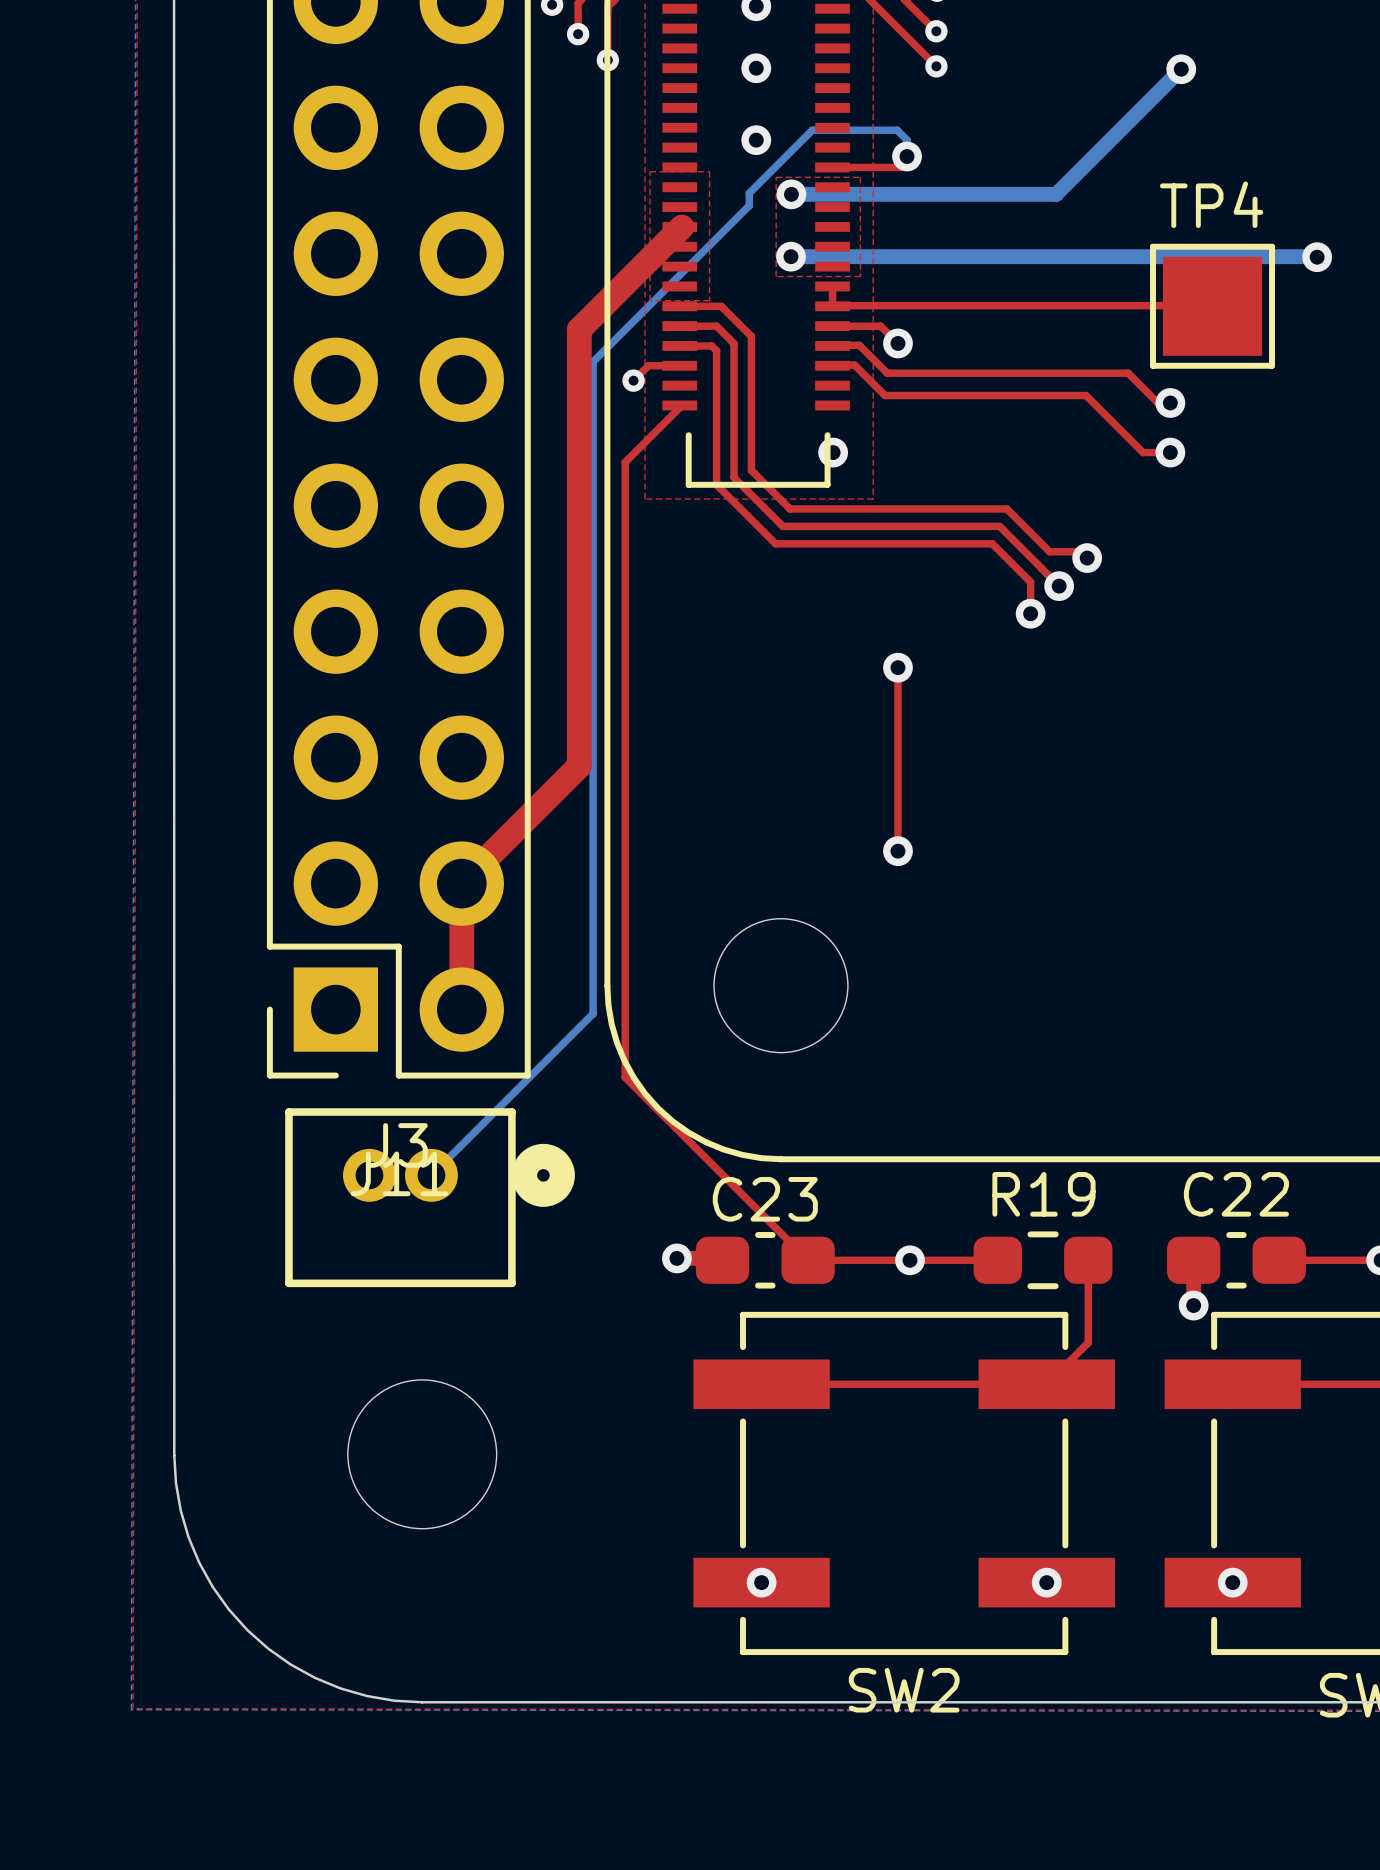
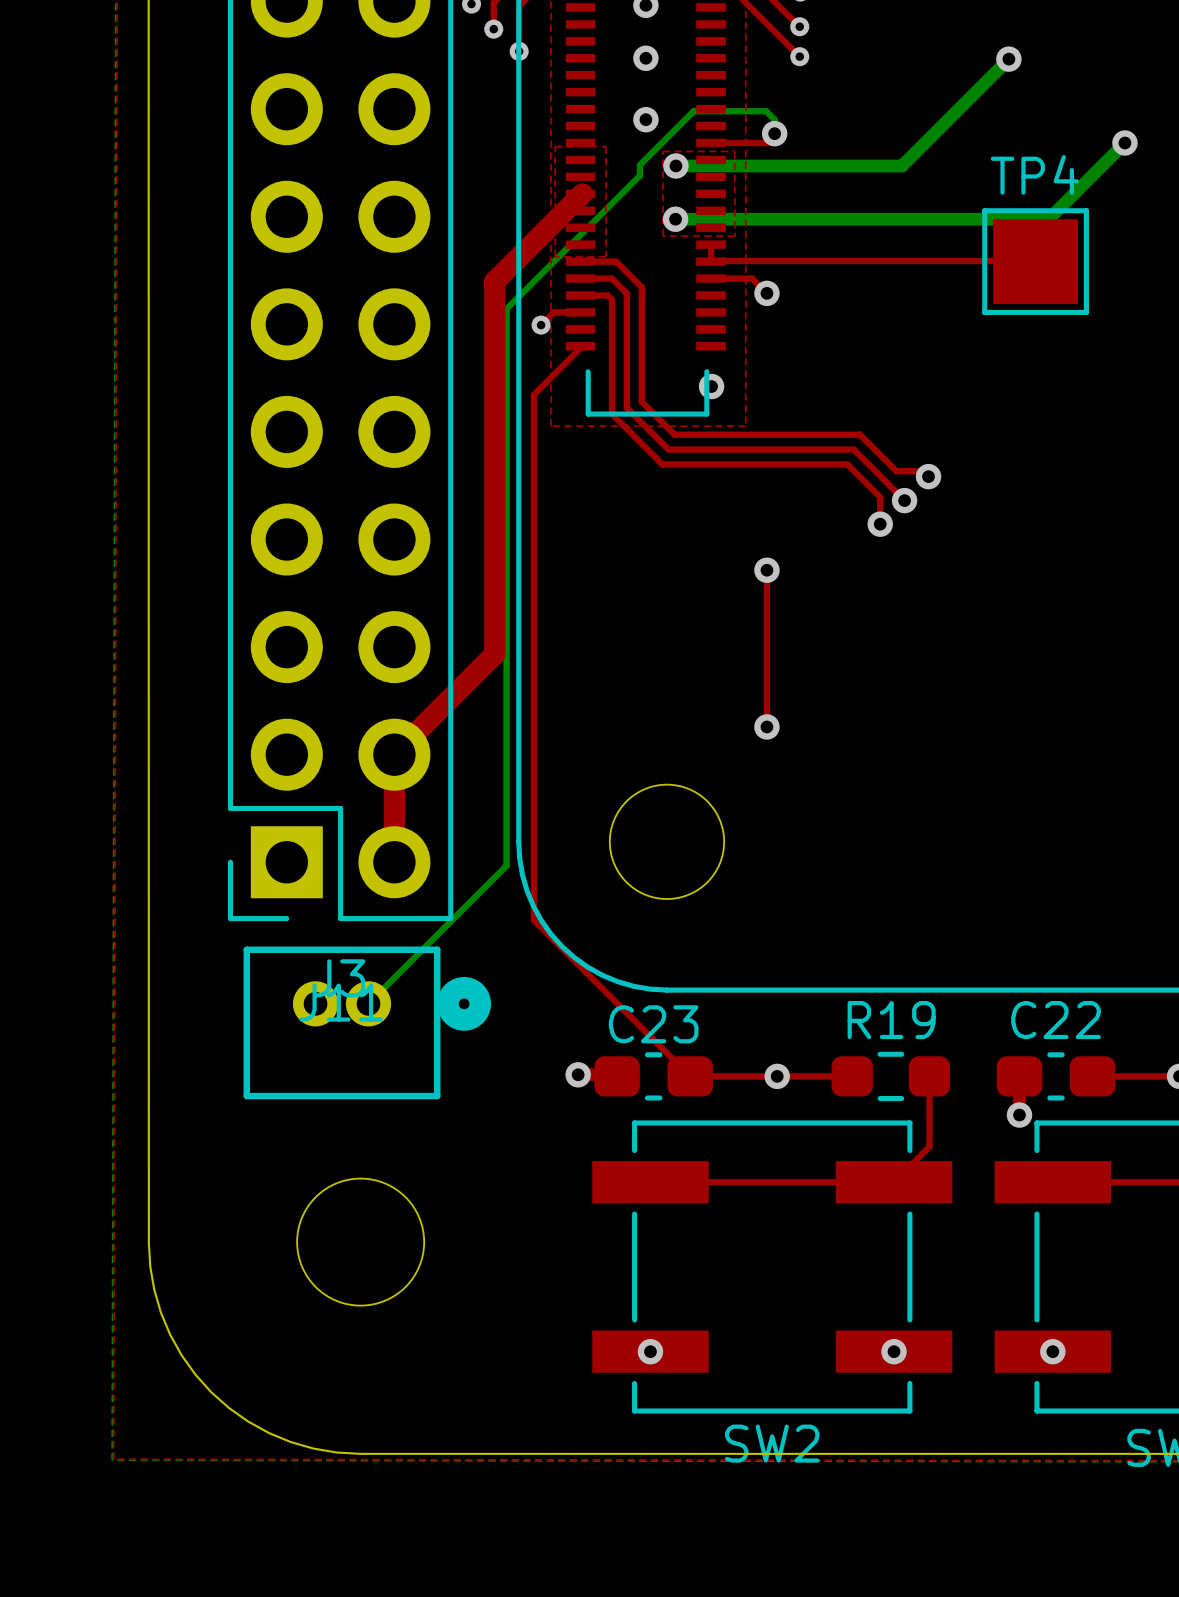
bottom track: (1227, 256) (1316, 256) -> (1048, 219) (1124, 142)
via position: (1317, 257) -> (1124, 142)
top track: (832, 345) (859, 345) (887, 373) (1128, 373) (1157, 402) (1170, 402) -> none
top track: (832, 365) (854, 365) (885, 395) (1086, 395) (1143, 452) (1170, 452) -> none
via: (1170, 402) -> none
via: (1170, 452) -> none

